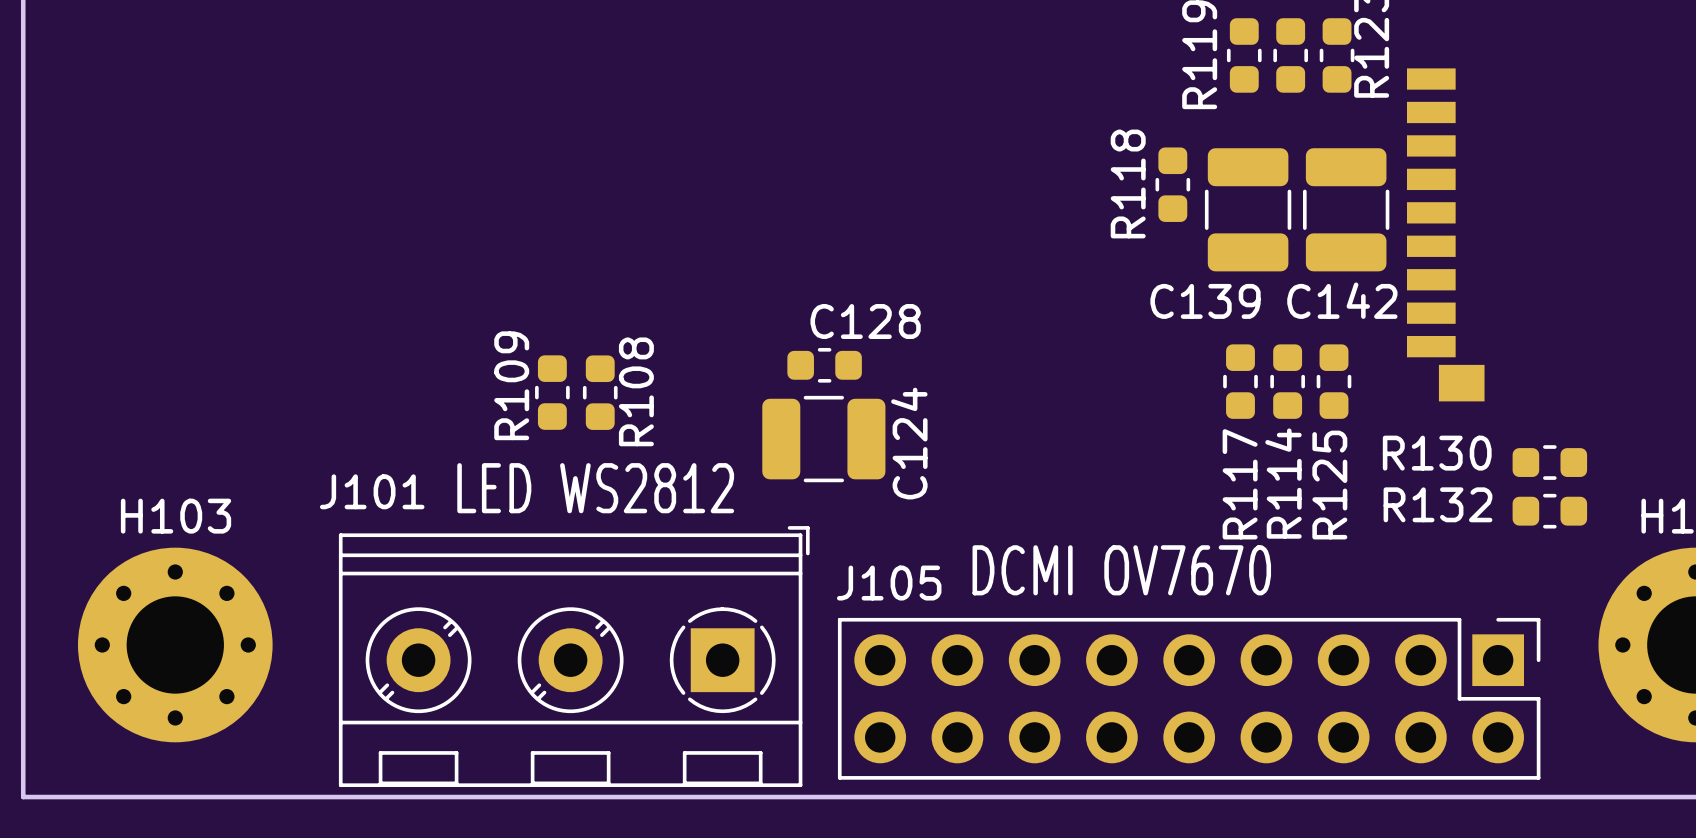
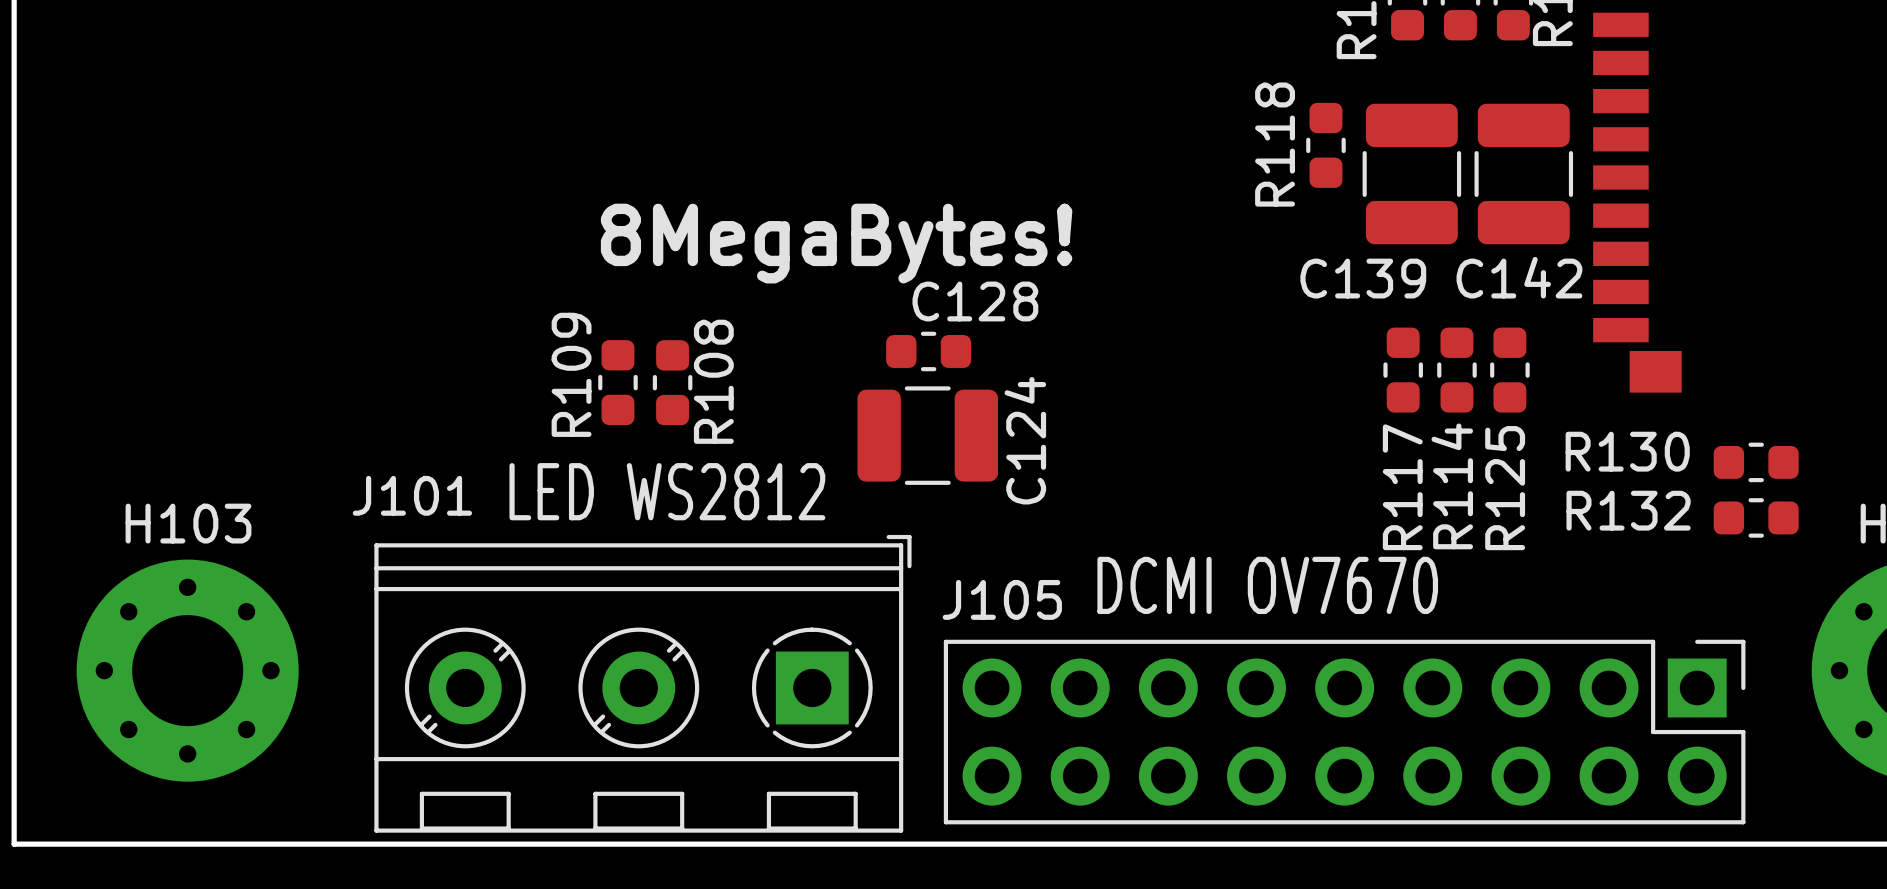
text: none -> 8MegaBytes! (836, 243)

